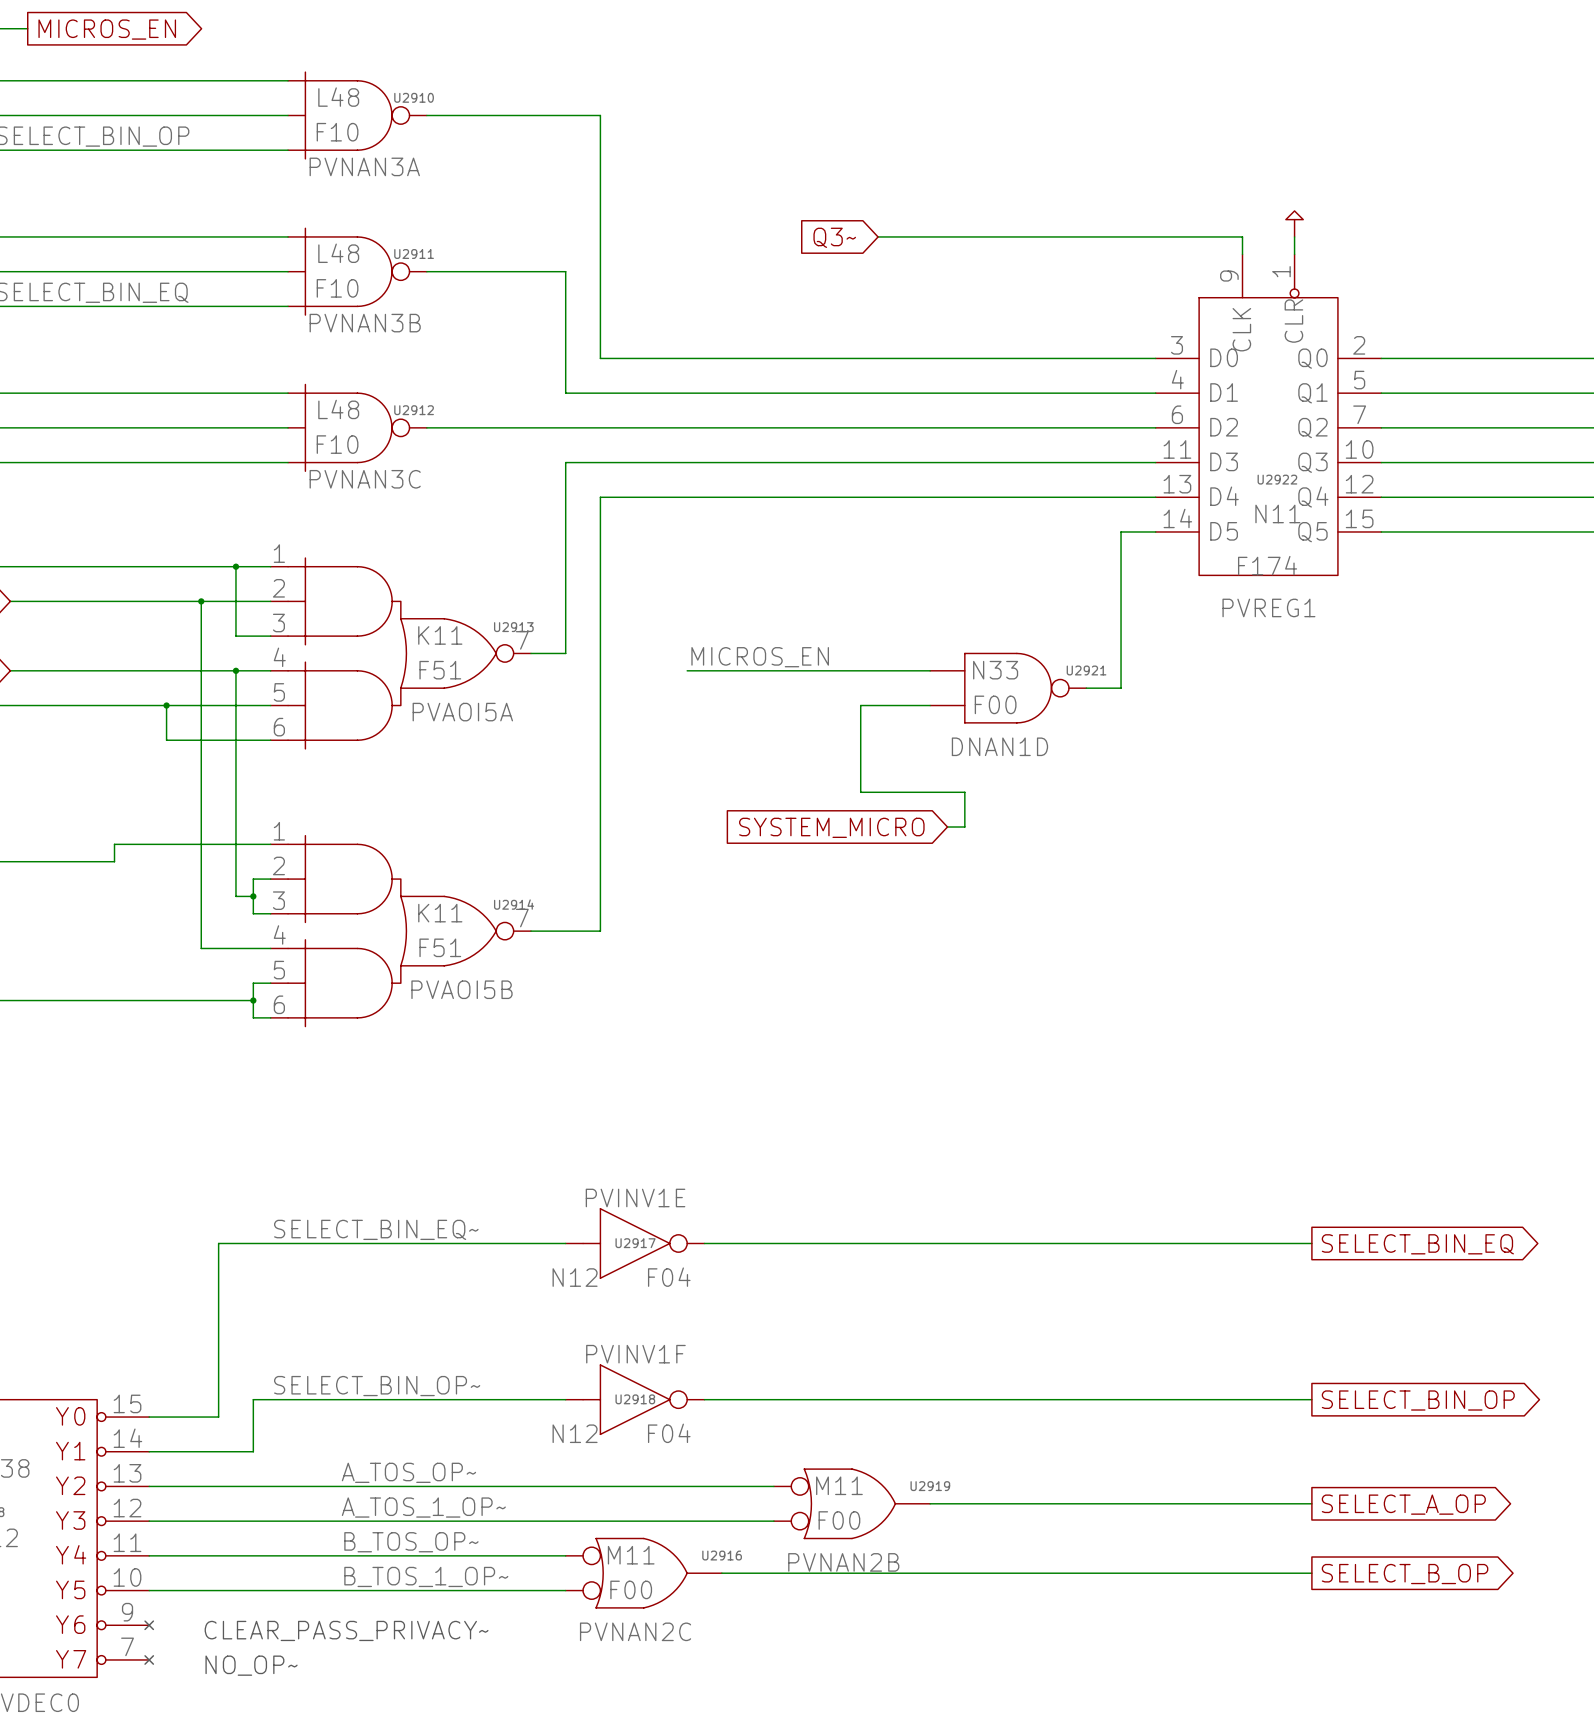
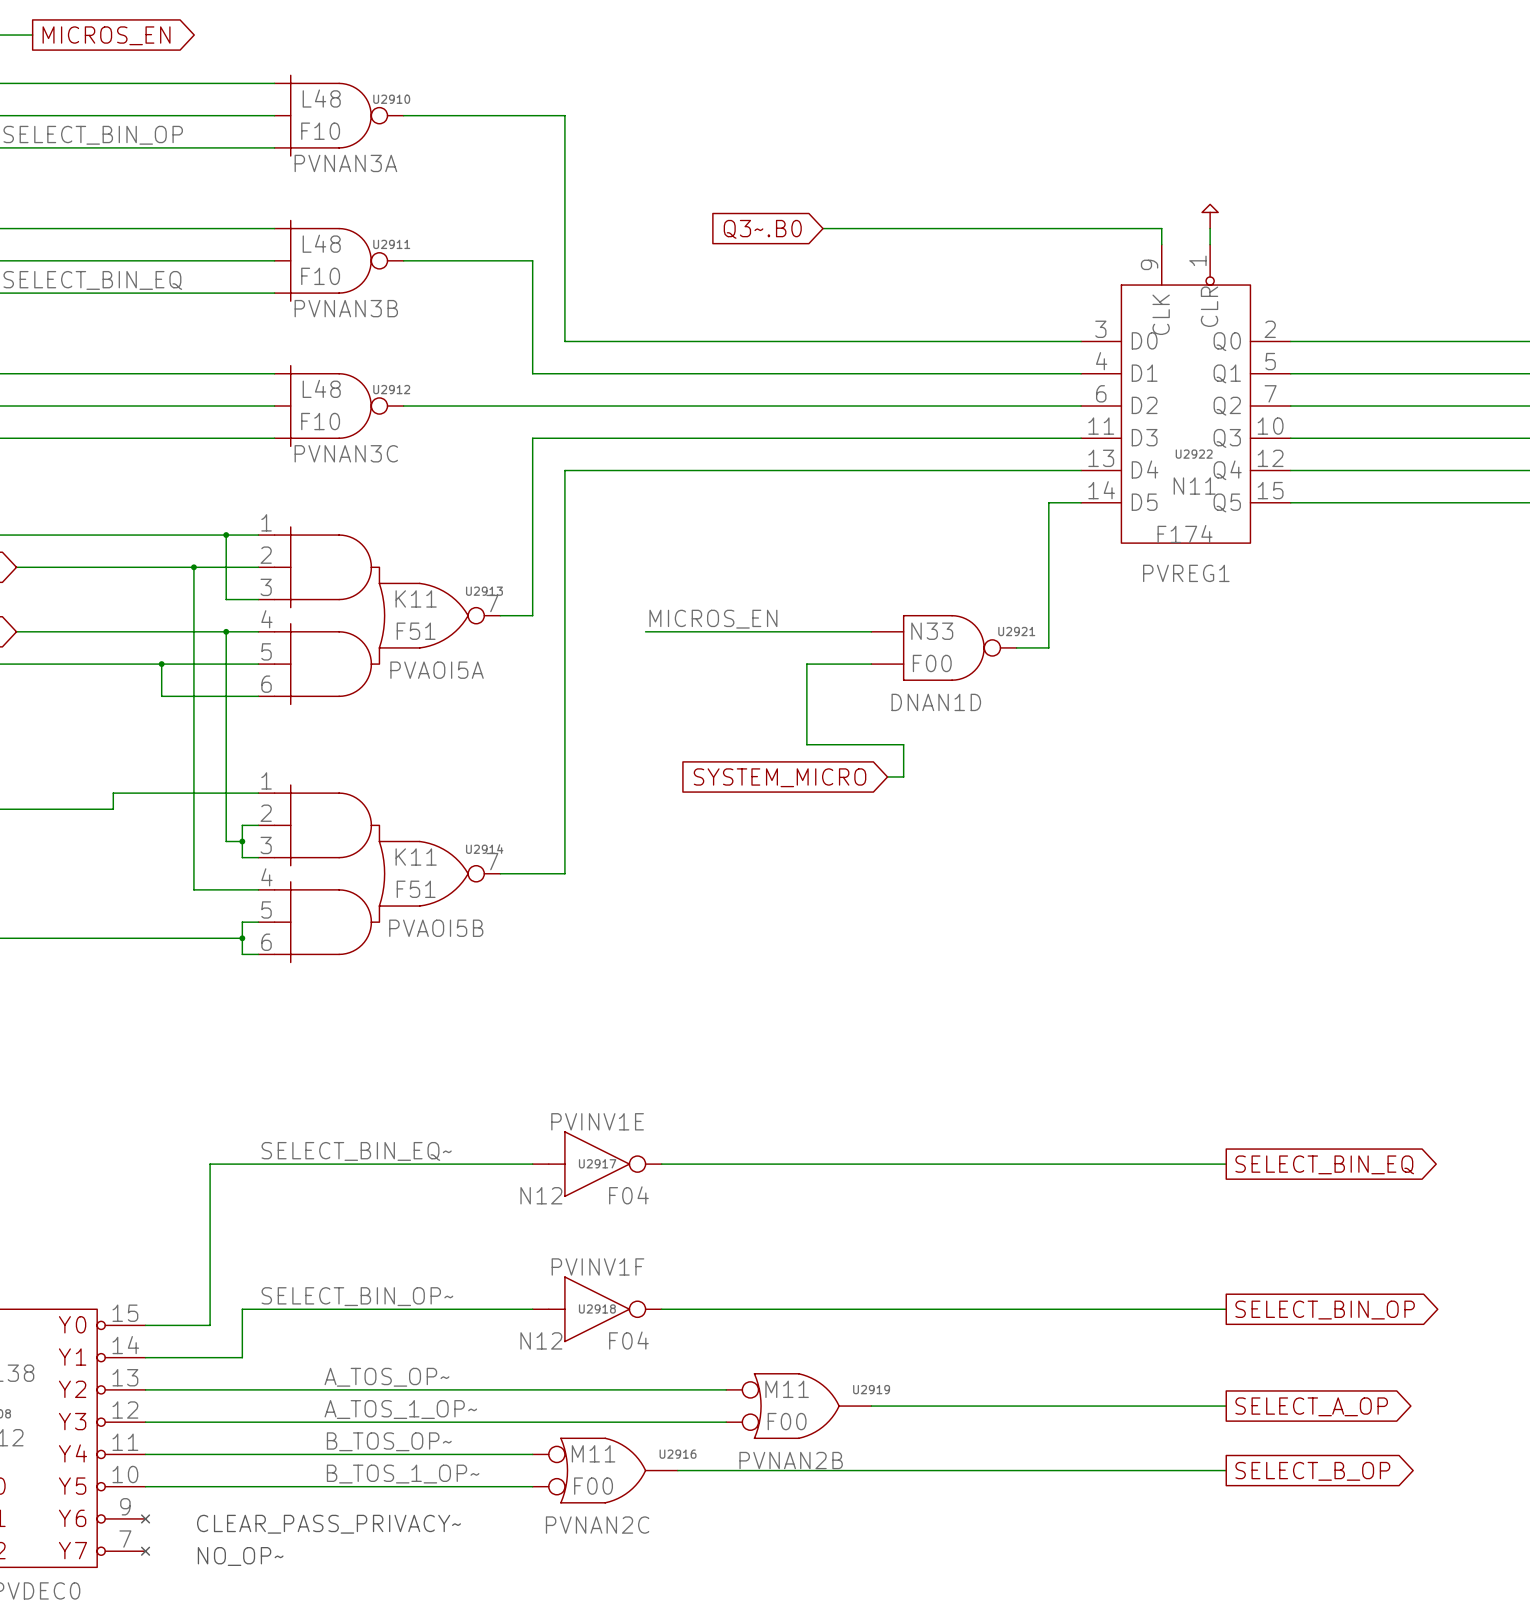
global label: Q3~ (834, 237) -> Q3~.B0 (762, 229)

